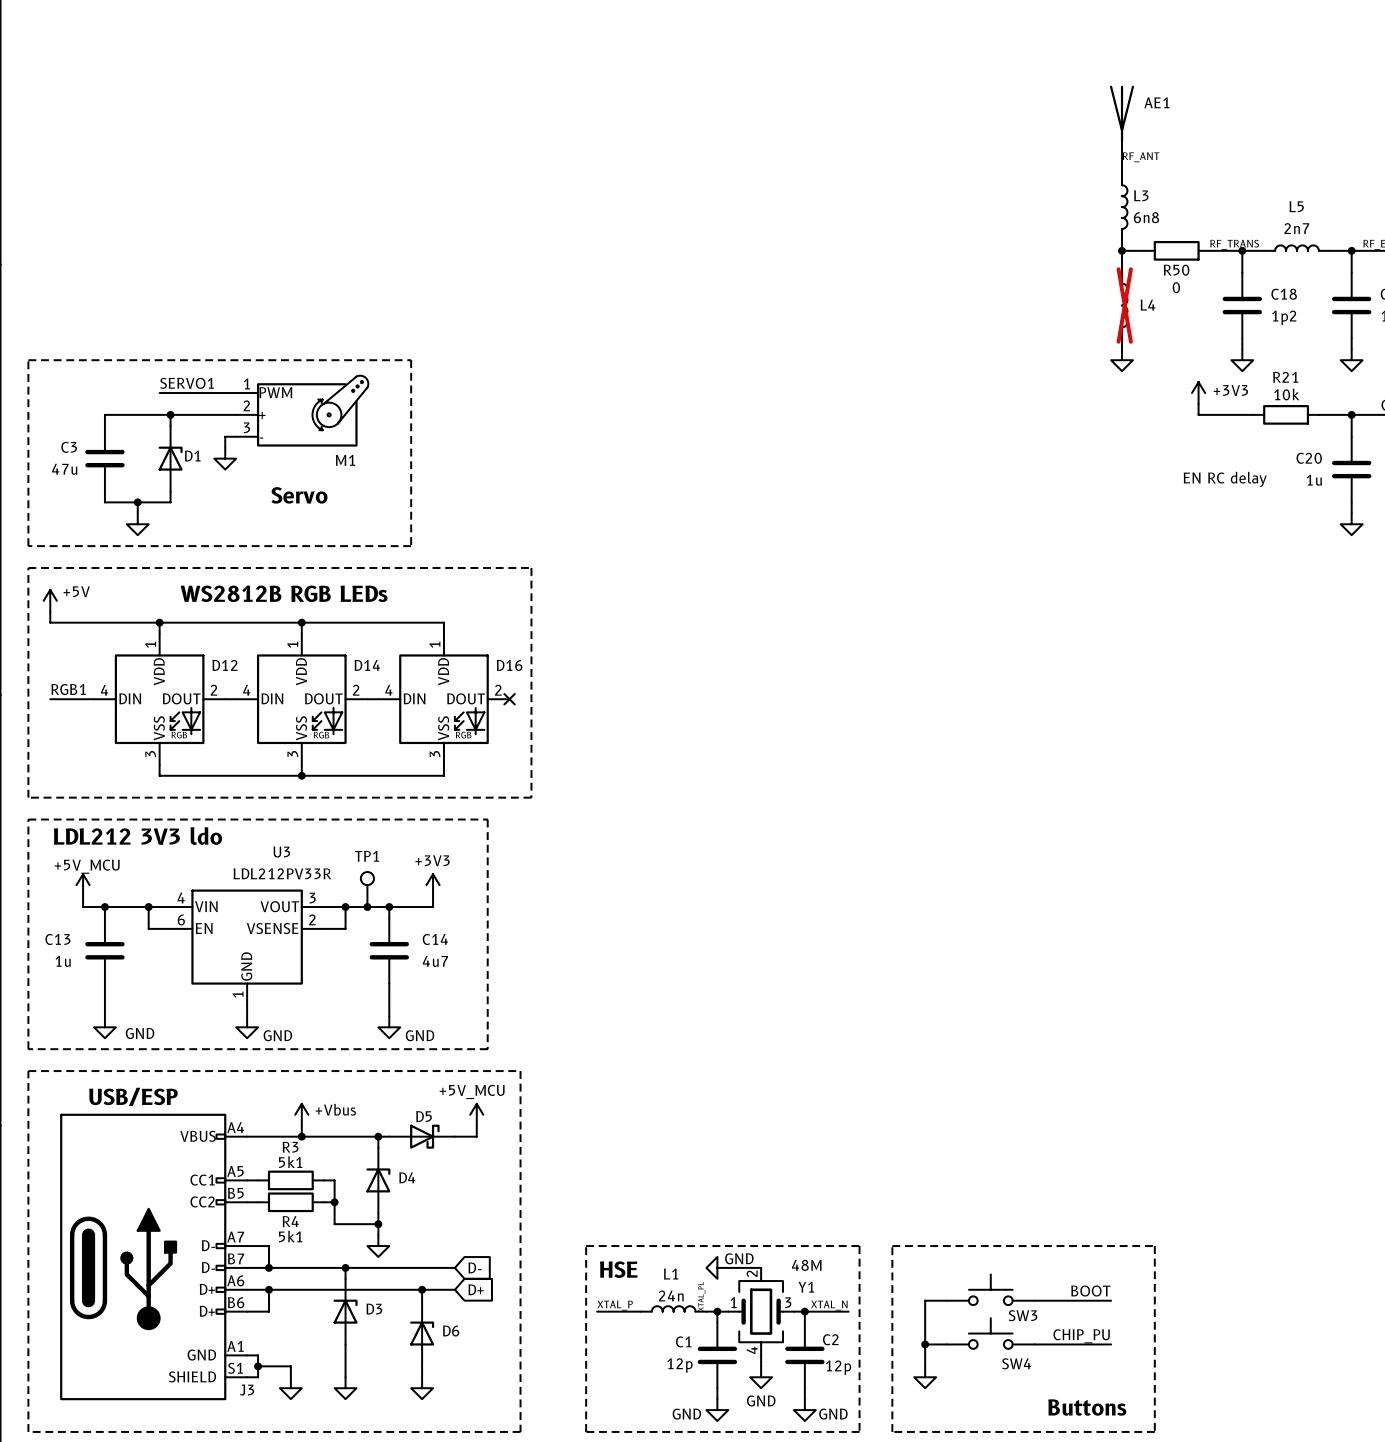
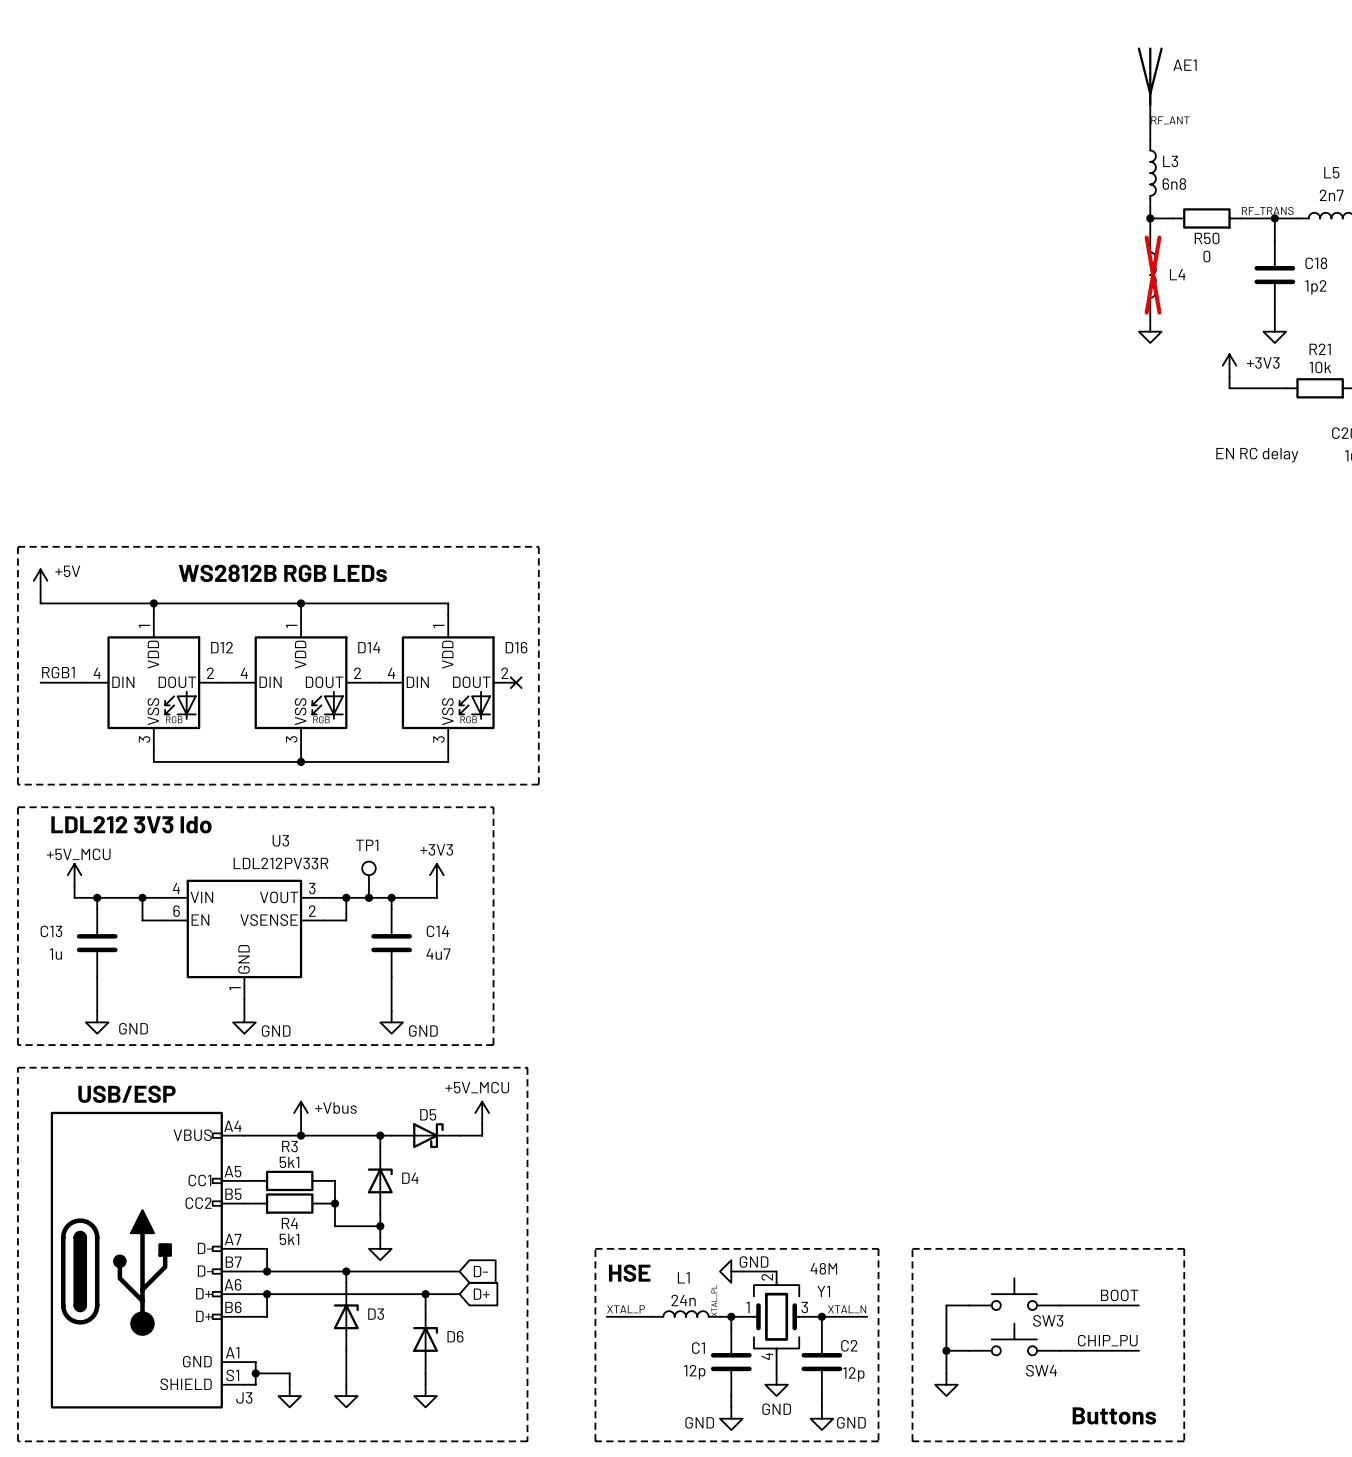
line: (28, 360) (411, 360) (411, 546) (28, 546) (28, 360) -> none
label: SERVO1 (187, 383) -> none
wire: (159, 393) (236, 393) -> none
M1: (302, 411) -> none
wire: (170, 414) (170, 425) -> none
junction: (170, 414) -> none
wire: (236, 414) (104, 414) (104, 425) -> none
wire: (236, 436) (225, 436) (225, 447) -> none
C3: 47u (104, 458) -> none
D1: (170, 458) -> none
power symbol: (225, 458) -> none
wire: (104, 491) (104, 502) (170, 502) (170, 491) -> none
text: Servo (299, 495) -> none
wire: (137, 502) (137, 513) -> none
junction: (137, 502) -> none
power symbol: (137, 524) -> none

